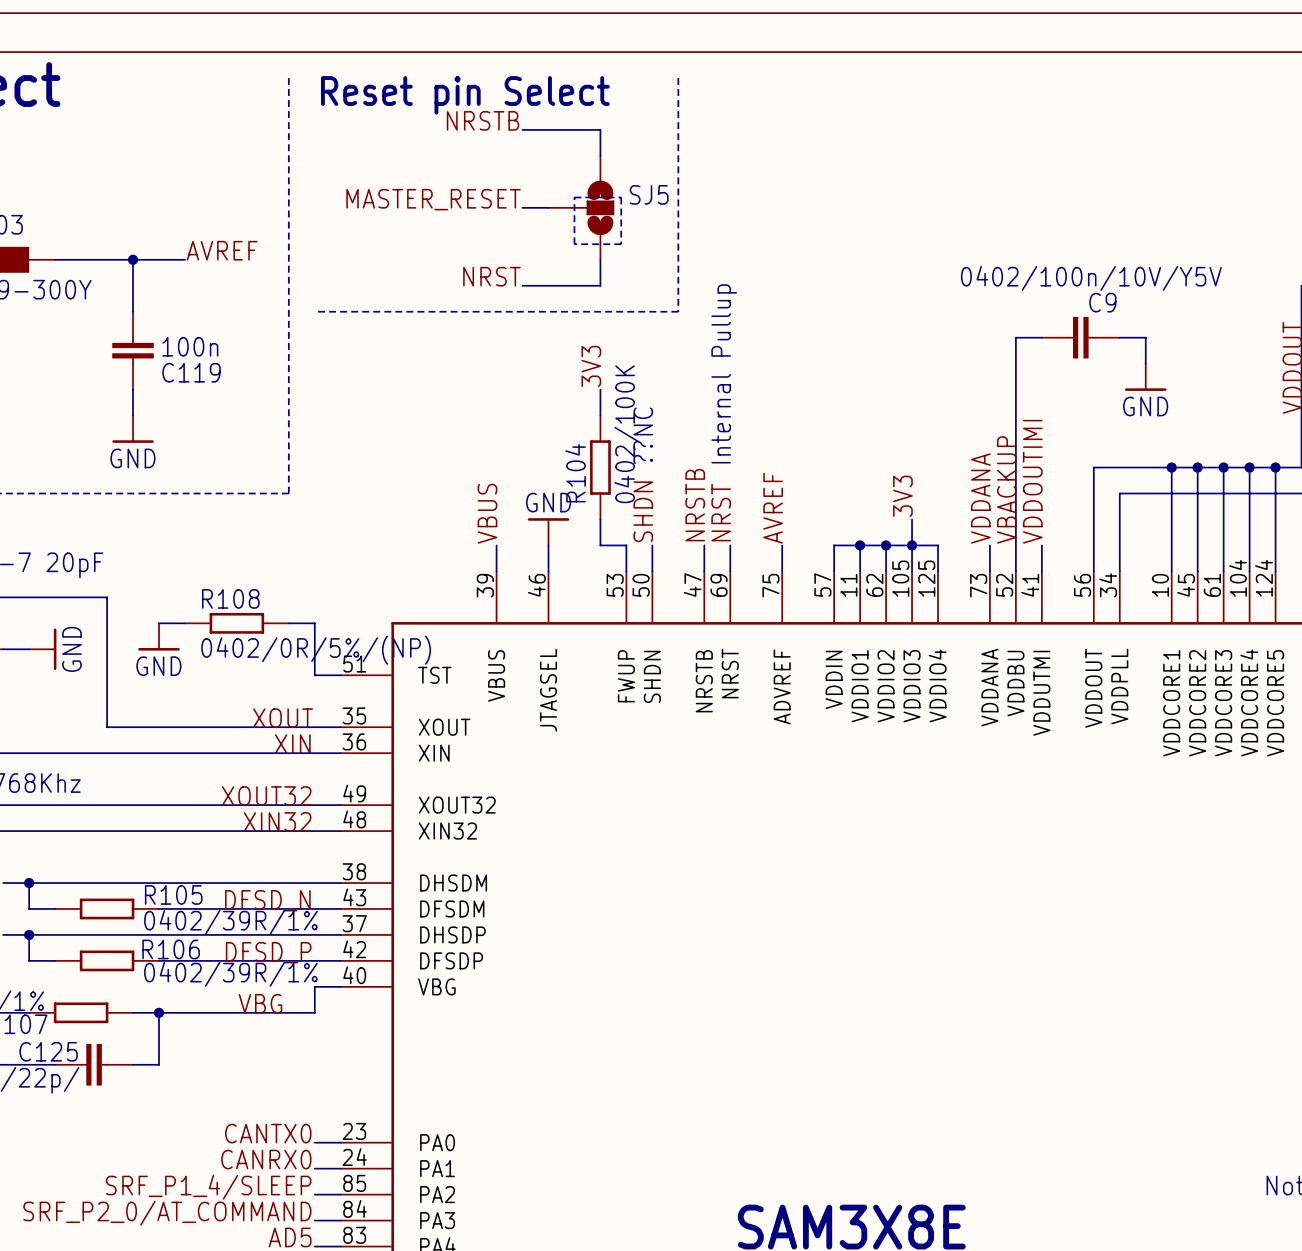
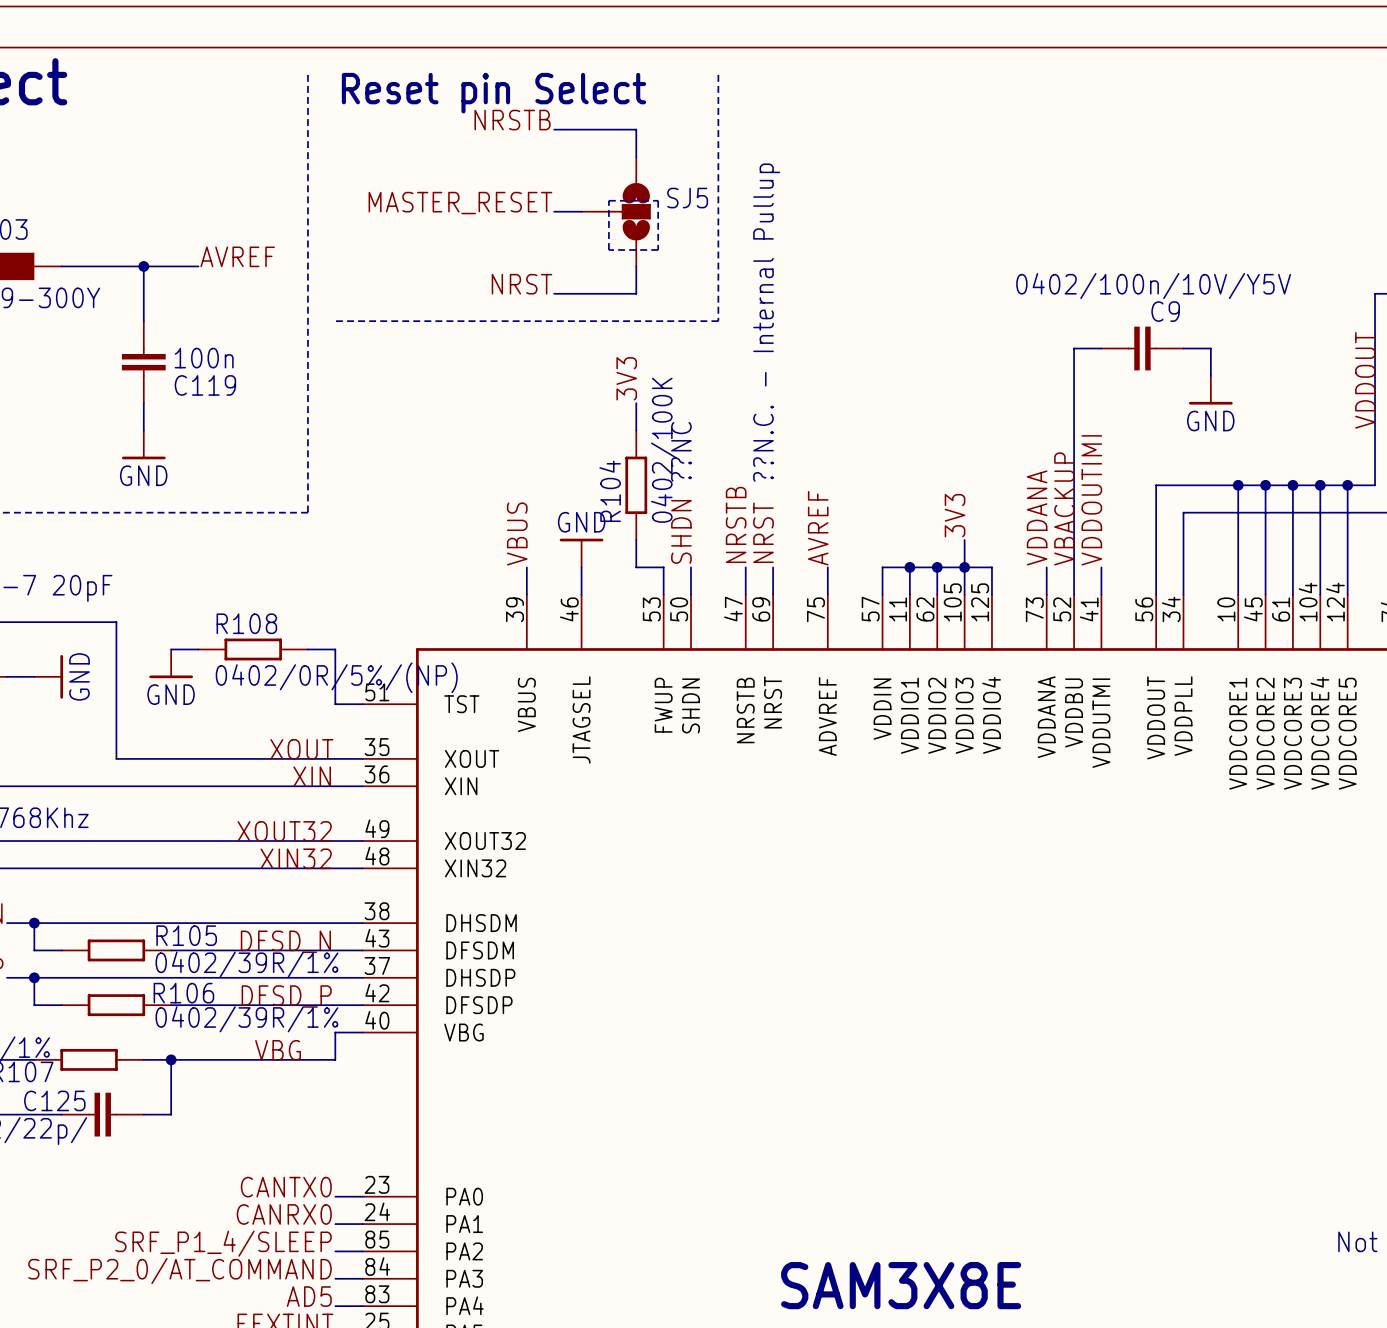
text: Internal Pullup (724, 373) -> ??N.C. - Internal Pullup (766, 322)

